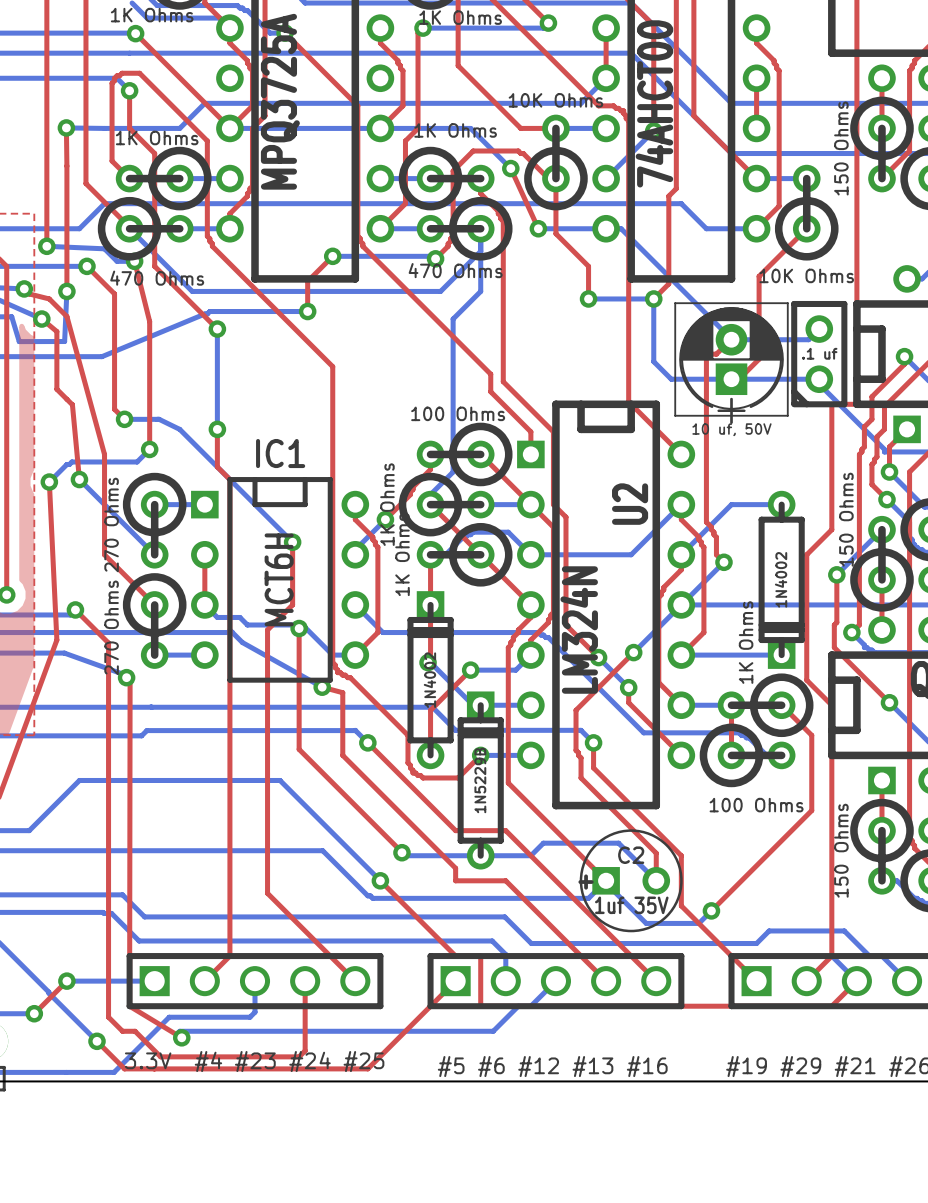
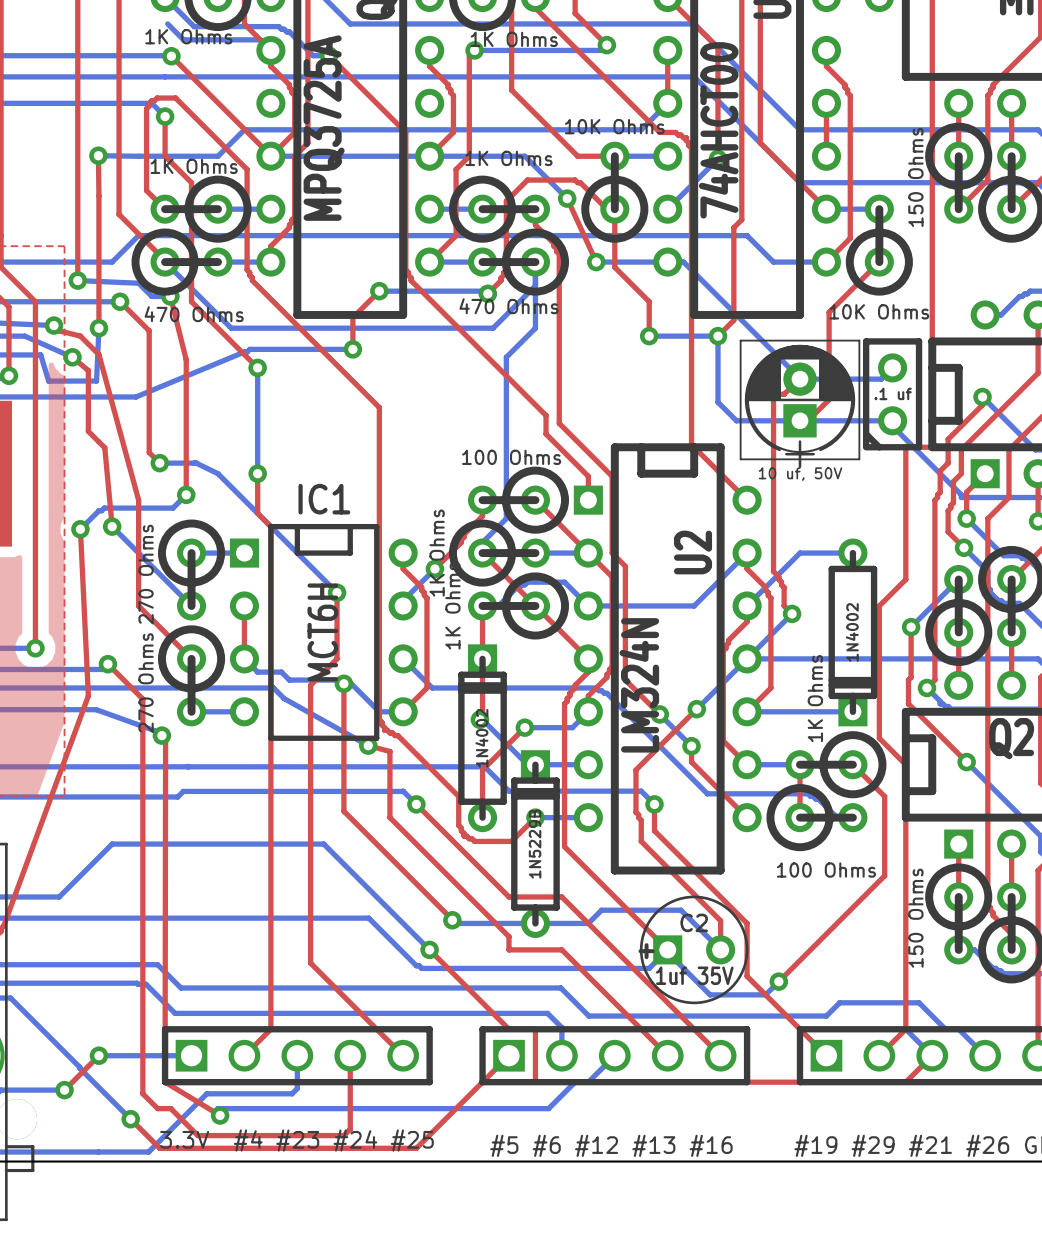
part value: 150 Ohms (846, 519) -> none

